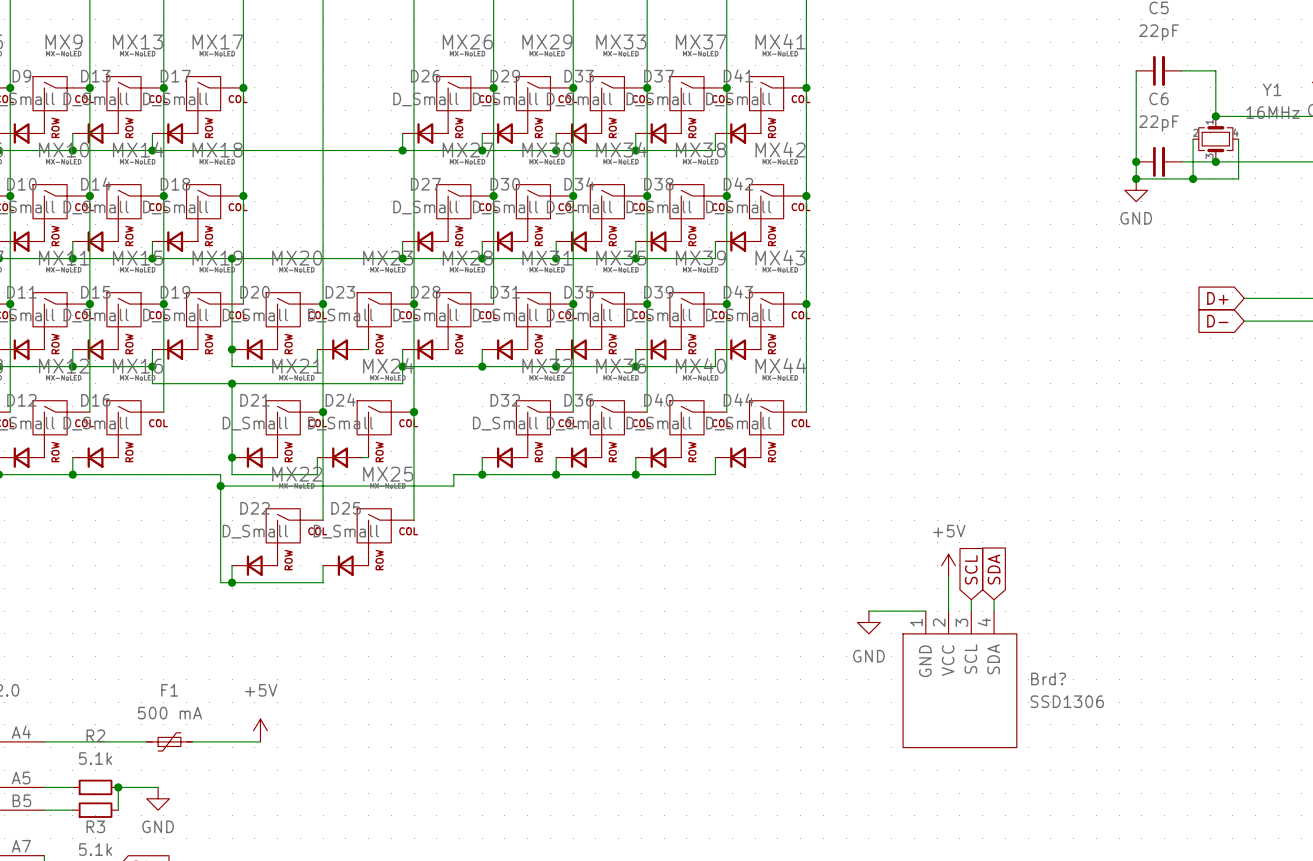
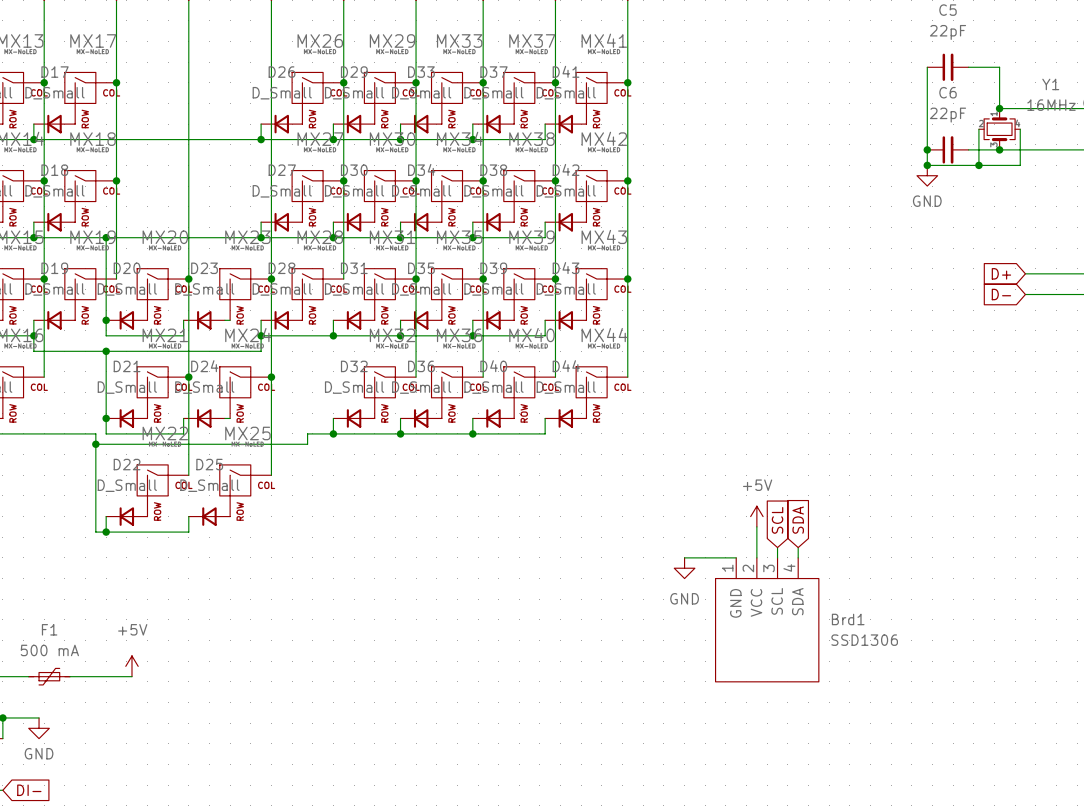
Brd? name: Brd? (1048, 678) -> Brd1 (848, 619)

